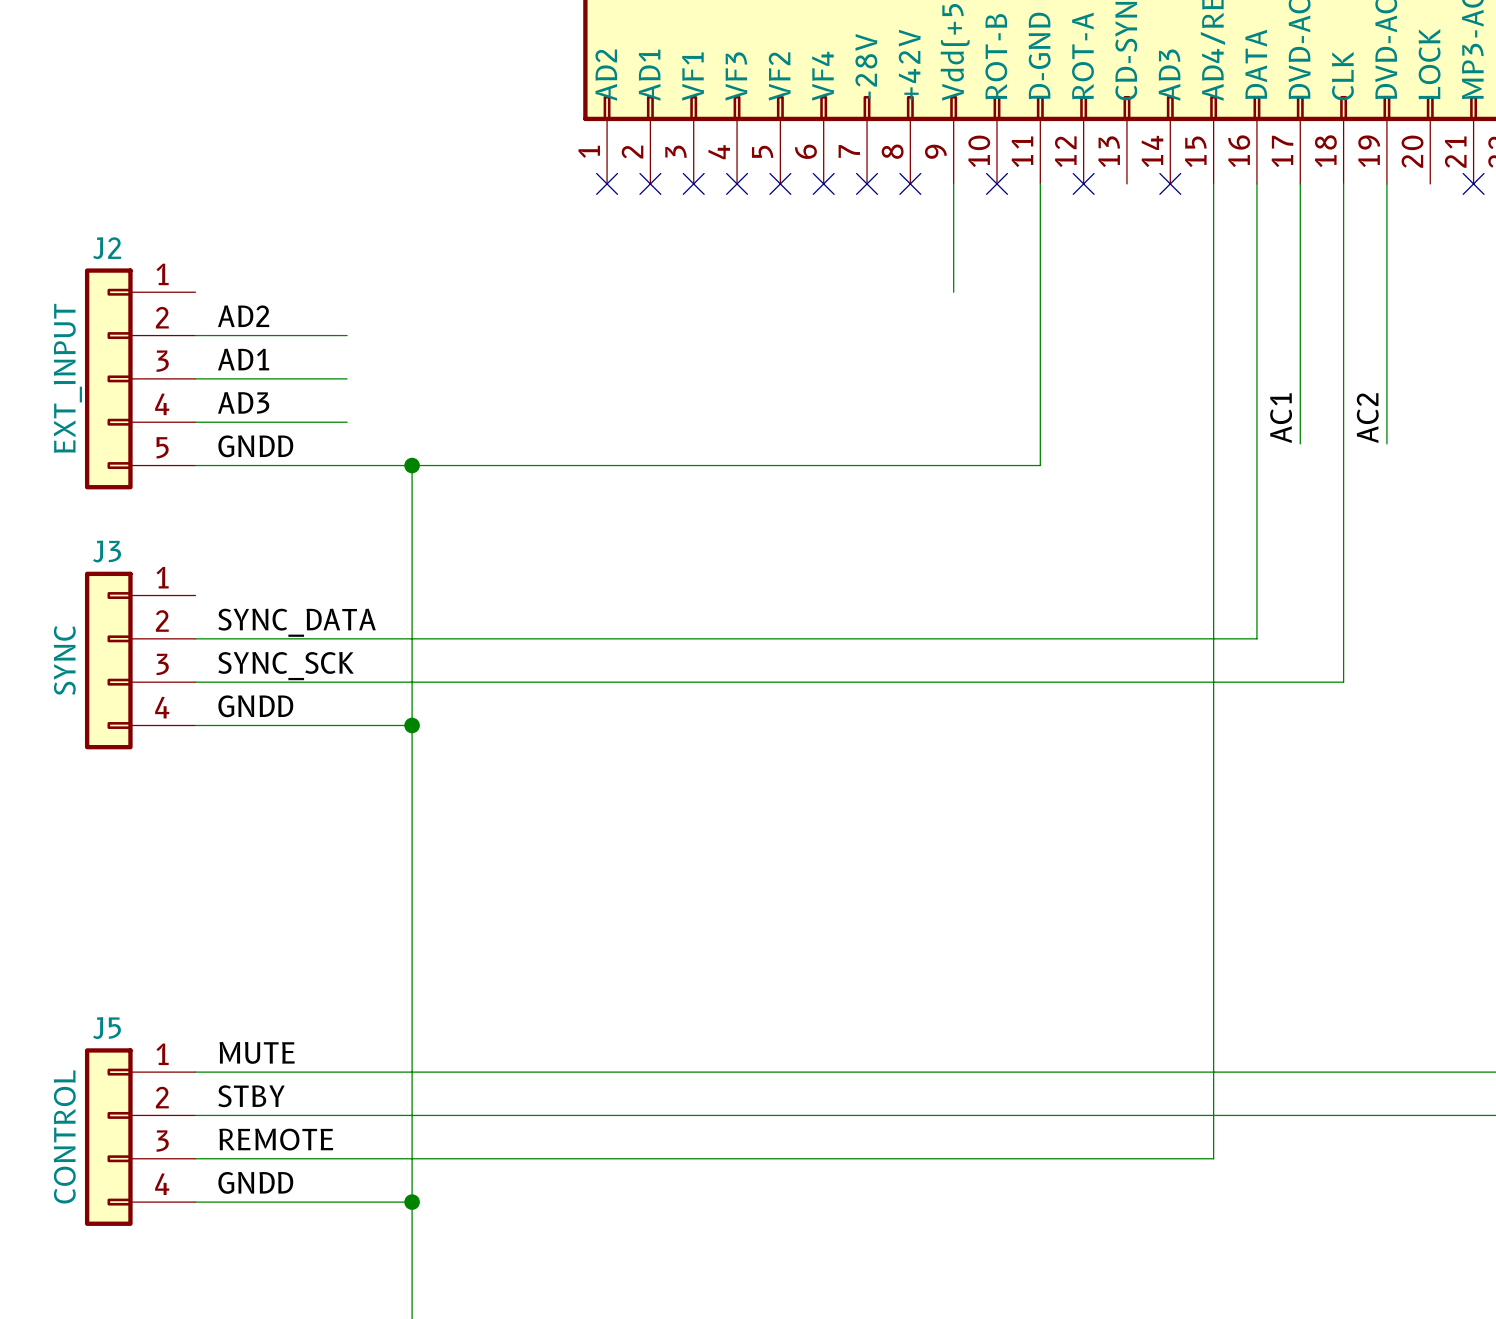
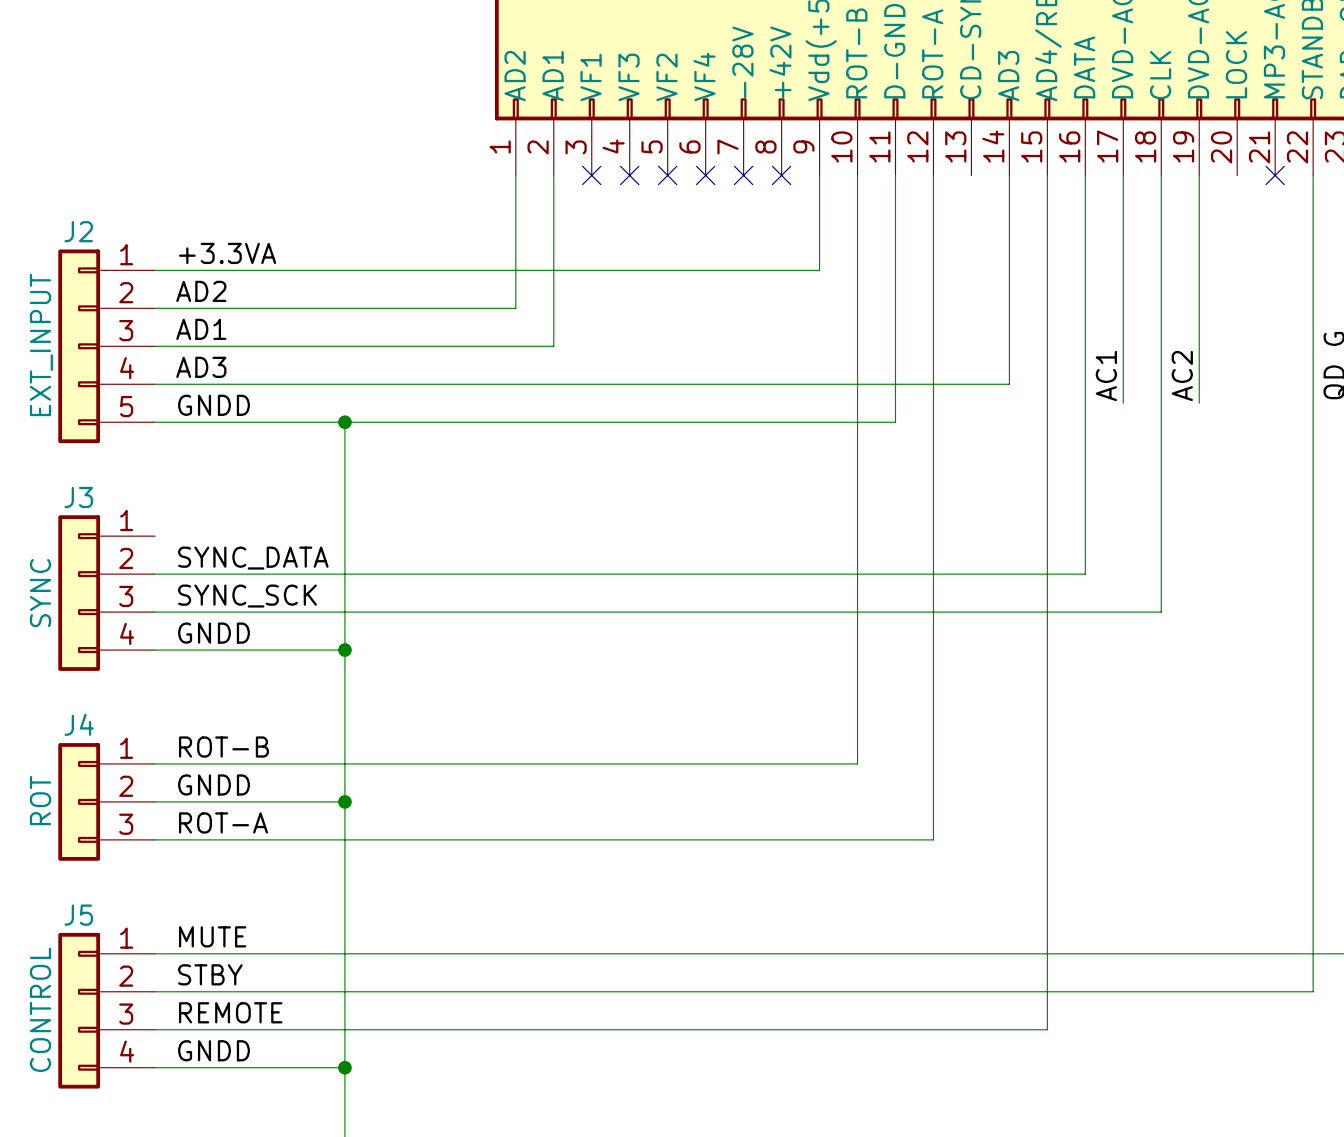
wire: none -> (515, 175) (515, 308) (287, 308)
no-connect mark: (607, 183) -> none
wire: none -> (553, 175) (553, 346) (287, 346)
no-connect mark: (650, 183) -> none
wire: none -> (857, 175) (857, 763) (155, 763)
no-connect mark: (996, 183) -> none
wire: none -> (933, 175) (933, 839) (155, 839)
no-connect mark: (1083, 183) -> none
wire: none -> (1009, 175) (1009, 384) (287, 384)
no-connect mark: (1170, 183) -> none
label: none -> +3.3VA (227, 253)
wire: none -> (155, 270) (819, 270)
label: none -> ROT-B (223, 747)
label: none -> GNDD (214, 784)
J4: none -> ROT (106, 801)
wire: none -> (155, 801) (344, 801)
junction: none -> (344, 801)
label: none -> ROT-A (223, 822)

